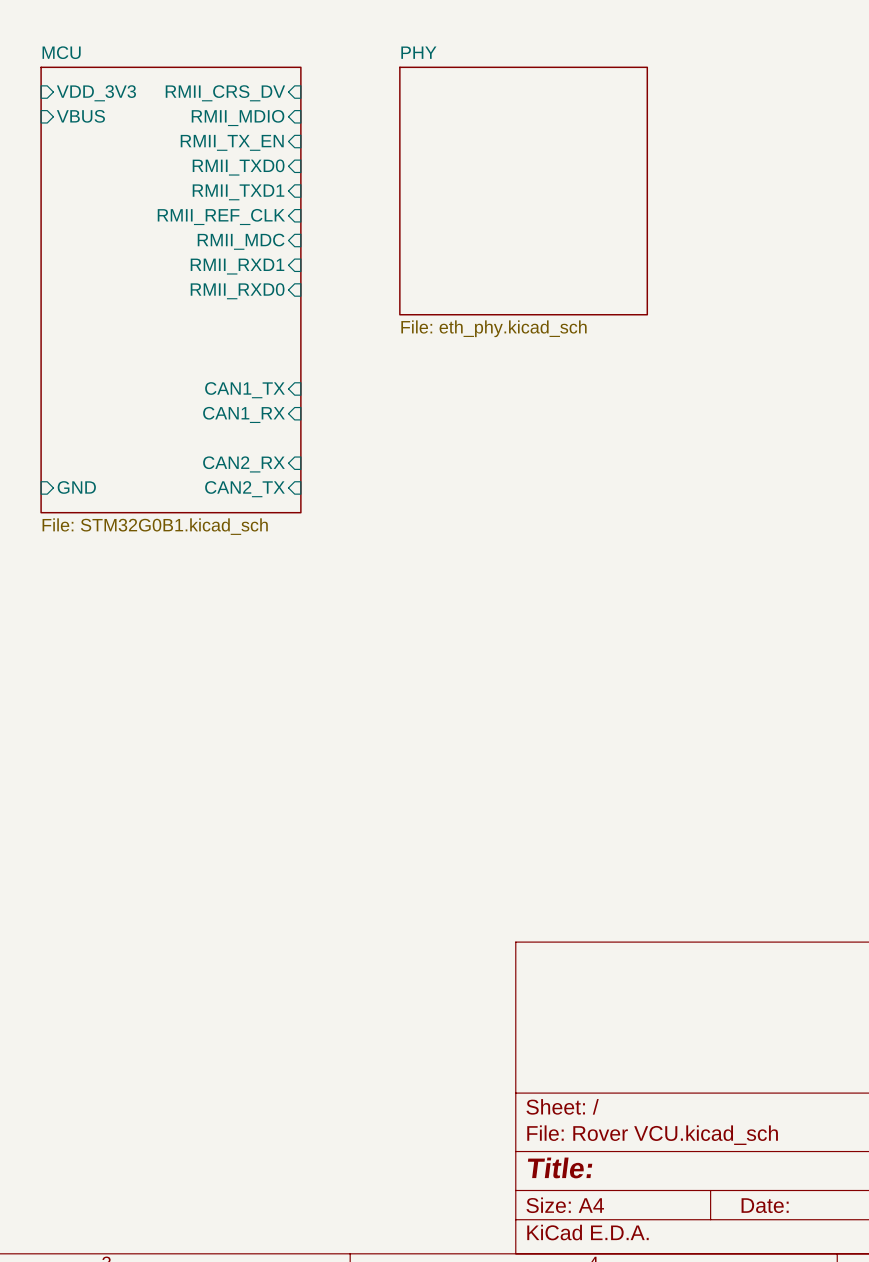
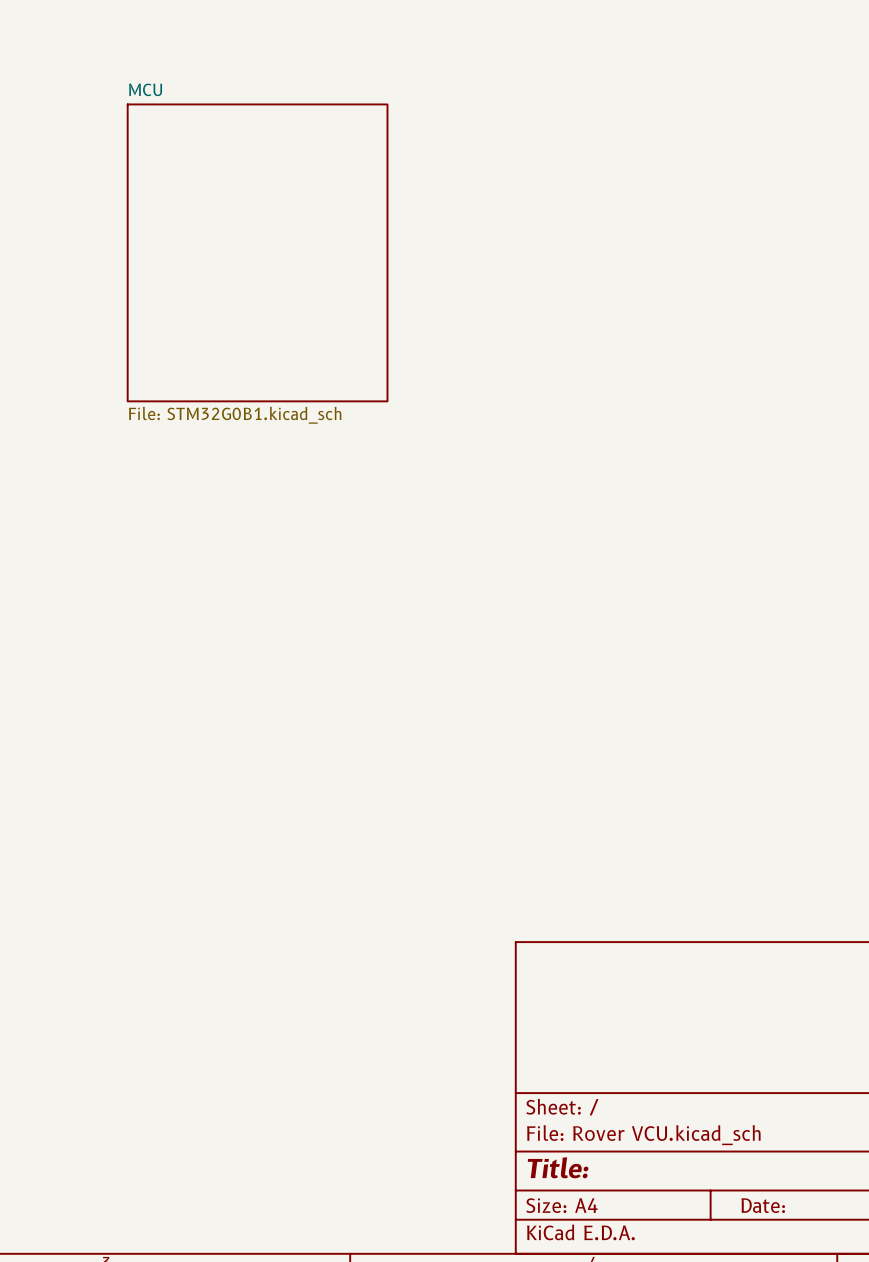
sheet pin: VDD_3V3 (96, 93) -> none
sheet pin: RMII_CRS_DV (225, 93) -> none
sheet pin: VBUS (80, 116) -> none
sheet pin: RMII_MDIO (238, 118) -> none
sheet pin: RMII_TX_EN (232, 142) -> none
sheet pin: RMII_TXD0 (238, 167) -> none
sheet PHY: File: eth_phy.kicad_sch (523, 191) -> none
sheet pin: RMII_TXD1 (238, 192) -> none
sheet pin: RMII_REF_CLK (221, 217) -> none
sheet pin: RMII_MDC (241, 241) -> none
sheet MCU: none -> File: STM32G0B1.kicad_sch (257, 252)
sheet pin: RMII_RXD1 (237, 266) -> none
sheet MCU: File: STM32G0B1.kicad_sch (170, 290) -> none
sheet pin: RMII_RXD0 (237, 291) -> none
sheet pin: CAN1_TX (244, 390) -> none
sheet pin: CAN1_RX (243, 414) -> none
sheet pin: CAN2_RX (243, 464) -> none
sheet pin: GND (76, 487) -> none
sheet pin: CAN2_TX (244, 489) -> none

